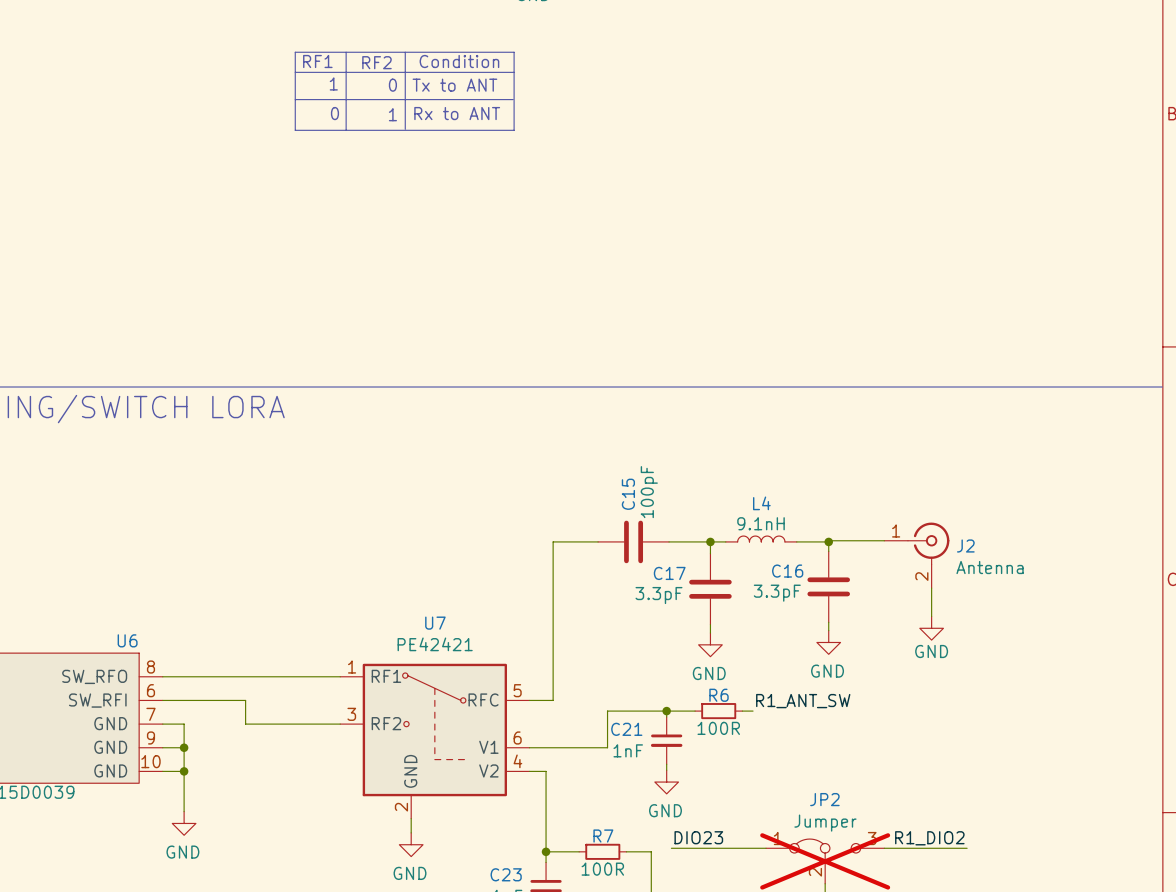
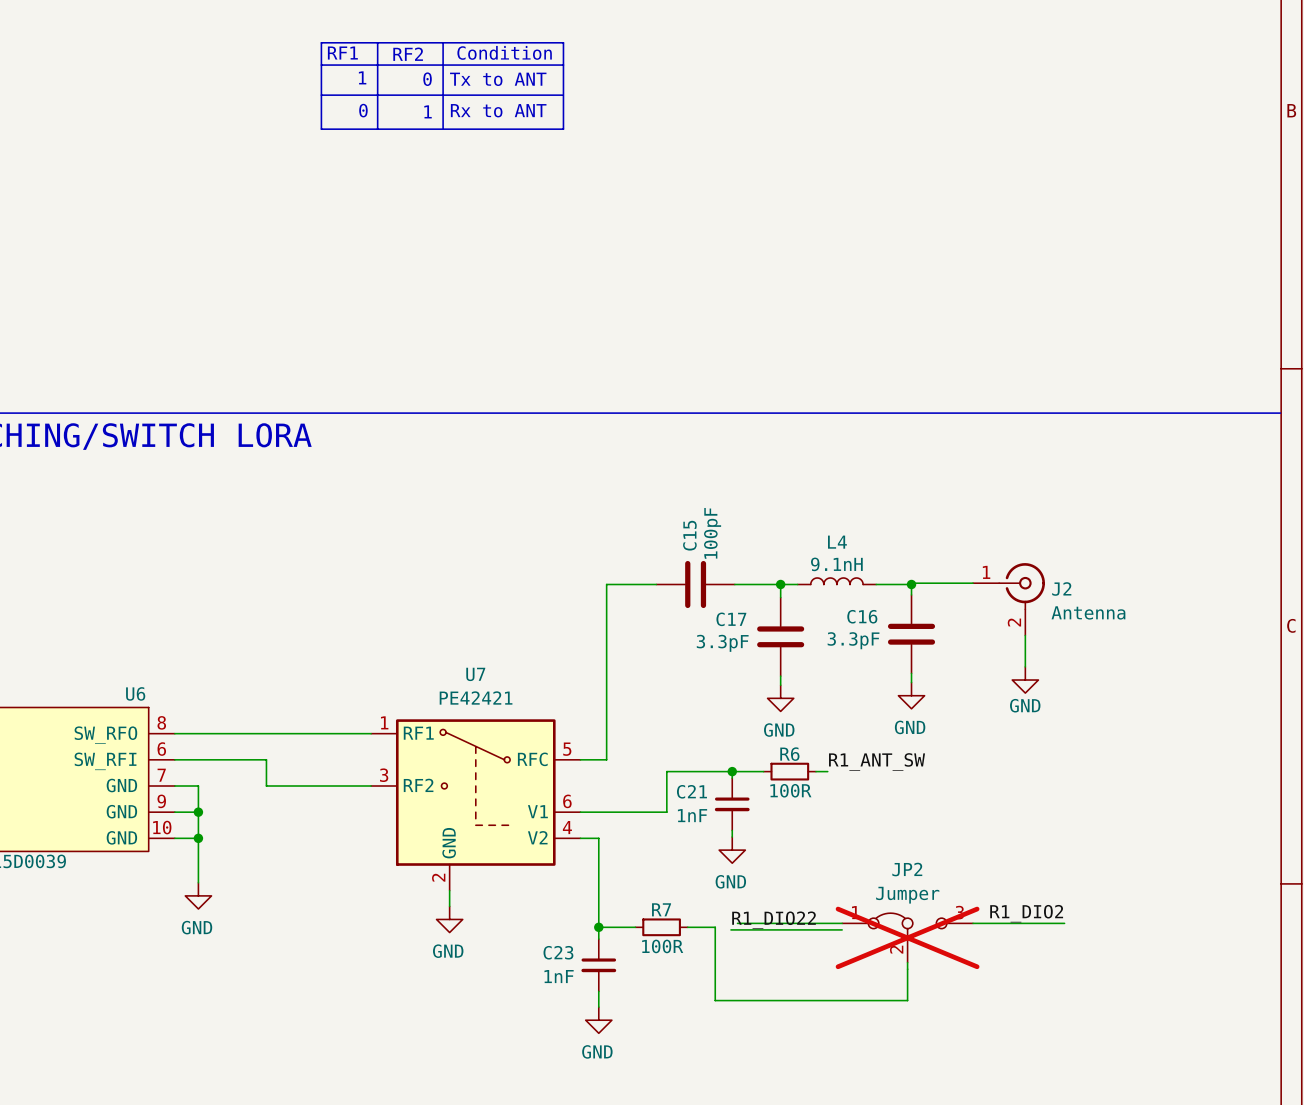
label: DIO23 (698, 837) -> R1_DIO22 (774, 920)
wire: none -> (730, 929) (842, 929)

